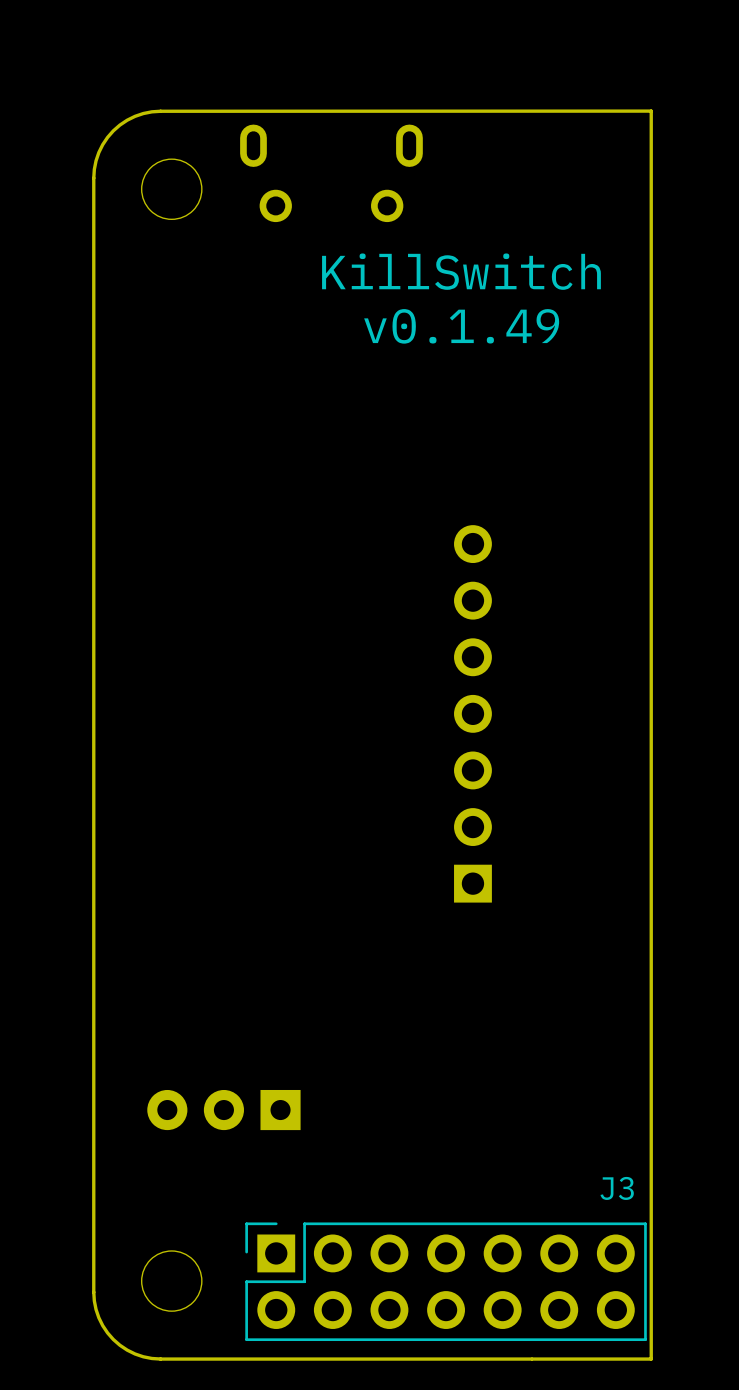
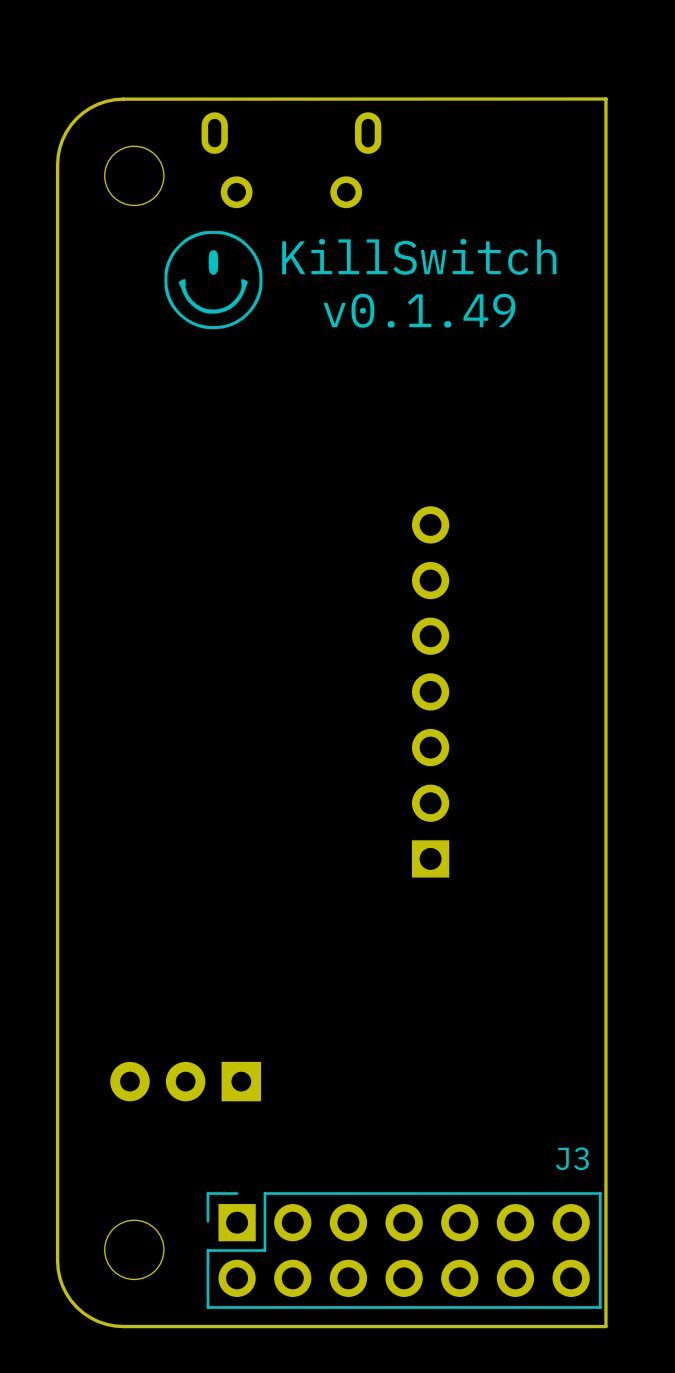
drawing: none -> [164, 230, 263, 330]

